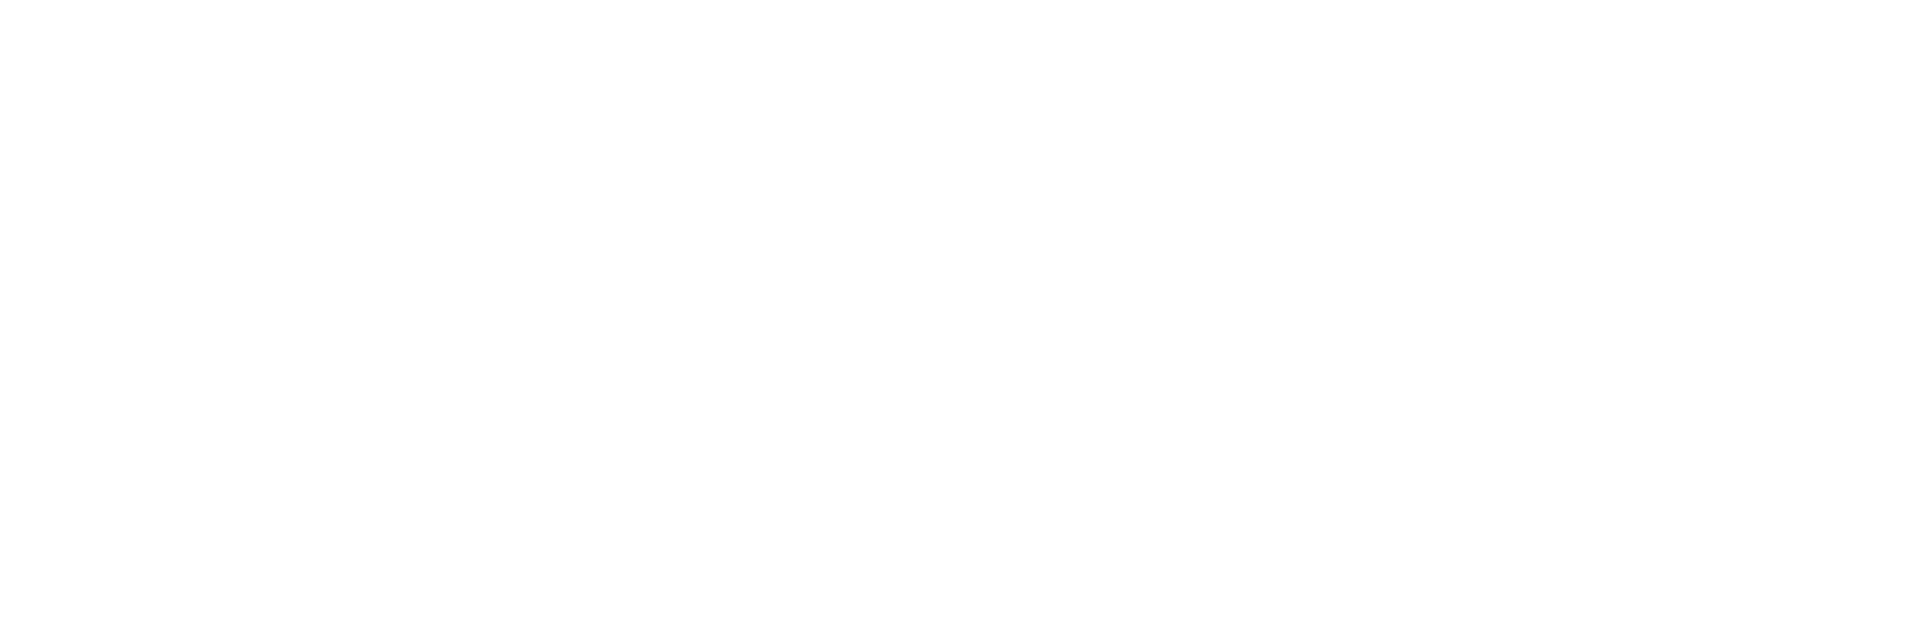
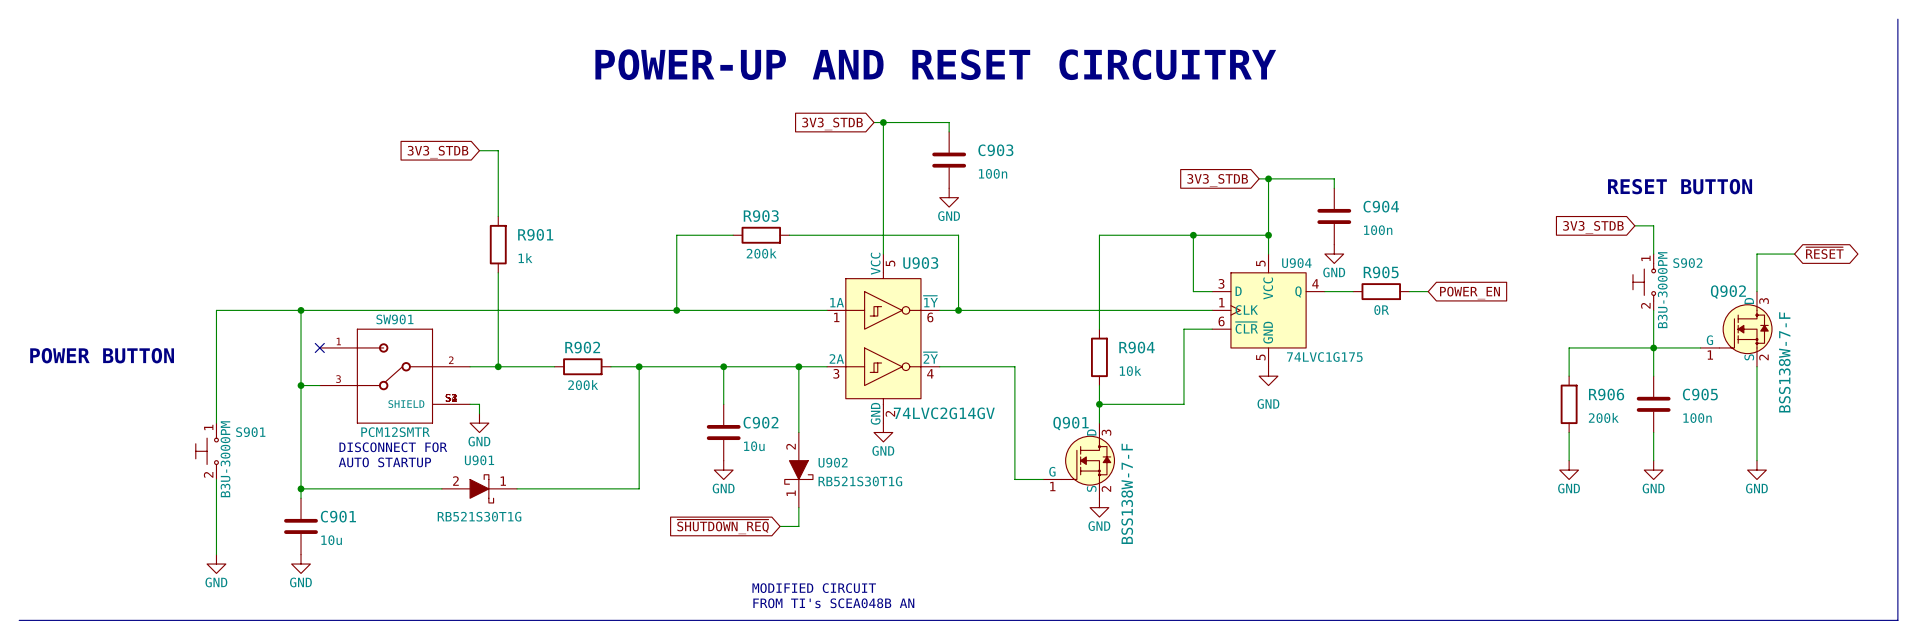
line: none -> (1897, 19) (1897, 620) (19, 620)
text: none -> POWER-UP AND RESET CIRCUITRY (935, 64)
wire: none -> (874, 122) (949, 122) (949, 131)
wire: none -> (883, 122) (883, 254)
junction: none -> (883, 122)
global label: none -> 3V3_STDB (832, 123)
wire: none -> (479, 150) (498, 150) (498, 216)
global label: none -> 3V3_STDB (438, 152)
C903: none -> (949, 160)
wire: none -> (1259, 178) (1334, 178) (1334, 188)
wire: none -> (1268, 178) (1268, 254)
junction: none -> (1268, 178)
global label: none -> 3V3_STDB (1217, 180)
text: none -> RESET BUTTON (1680, 186)
power symbol: none -> GND (949, 197)
C904: none -> (1334, 216)
wire: none -> (1634, 225) (1653, 225) (1653, 254)
global label: none -> 3V3_STDB (1593, 227)
wire: none -> (733, 235) (676, 235) (676, 310)
R903: none -> (761, 235)
wire: none -> (789, 235) (958, 235) (958, 310)
wire: none -> (1193, 235) (1193, 291) (1212, 291)
junction: none -> (1193, 235)
wire: none -> (1268, 235) (1099, 235) (1099, 329)
junction: none -> (1268, 235)
R901: none -> (498, 244)
global label: none -> ~{RESET} (1824, 253)
power symbol: none -> GND (1334, 254)
wire: none -> (1794, 254) (1756, 254) (1756, 291)
wire: none -> (498, 272) (498, 366)
S902: none -> B3U-3000PM (1644, 282)
wire: none -> (1324, 291) (1353, 291)
R905: none -> (1381, 291)
wire: none -> (1409, 291) (1428, 291)
global label: none -> POWER_EN (1469, 293)
wire: none -> (301, 310) (301, 498)
junction: none -> (301, 310)
junction: none -> (676, 310)
wire: none -> (827, 310) (216, 310) (216, 423)
wire: none -> (939, 310) (1212, 310)
junction: none -> (958, 310)
U904: none -> 74LVC1G175 (1268, 310)
wire: none -> (1653, 310) (1653, 376)
wire: none -> (1212, 329) (1183, 329) (1183, 404) (1099, 404)
Q902: none -> BSS138W-7-F (1736, 329)
U903: none -> 74LVC2G14GV (883, 338)
no-connect mark: none -> (319, 347)
junction: none -> (1653, 347)
wire: none -> (1700, 347) (1569, 347) (1569, 376)
text: none -> POWER BUTTON (102, 355)
R904: none -> (1099, 357)
wire: none -> (470, 366) (554, 366)
junction: none -> (498, 366)
R902: none -> (582, 366)
wire: none -> (610, 366) (827, 366)
wire: none -> (639, 366) (639, 488) (517, 488)
junction: none -> (639, 366)
wire: none -> (723, 366) (723, 404)
junction: none -> (723, 366)
wire: none -> (798, 366) (798, 432)
junction: none -> (798, 366)
wire: none -> (939, 366) (1014, 366) (1014, 479) (1043, 479)
wire: none -> (1756, 366) (1756, 460)
SW901: none -> PCM12SMTR (394, 376)
power symbol: none -> GND (1268, 376)
wire: none -> (301, 385) (319, 385)
junction: none -> (301, 385)
wire: none -> (1099, 385) (1099, 423)
wire: none -> (470, 404) (479, 404) (479, 413)
junction: none -> (1099, 404)
R906: none -> (1569, 404)
C905: none -> (1653, 404)
power symbol: none -> GND (479, 423)
C902: none -> (723, 432)
power symbol: none -> GND (883, 432)
wire: none -> (1569, 432) (1569, 460)
wire: none -> (1653, 432) (1653, 460)
text: none -> DISCONNECT FOR (393, 447)
S901: none -> B3U-3000PM (207, 451)
Q901: none -> BSS138W-7-F (1078, 460)
text: none -> AUTO STARTUP (384, 462)
power symbol: none -> GND (723, 470)
U902: none -> RB521S30T1G (798, 470)
power symbol: none -> GND (1569, 470)
power symbol: none -> GND (1653, 470)
power symbol: none -> GND (1756, 470)
wire: none -> (216, 479) (216, 554)
wire: none -> (301, 488) (441, 488)
junction: none -> (301, 488)
U901: none -> RB521S30T1G (479, 488)
wire: none -> (798, 507) (798, 526) (780, 526)
power symbol: none -> GND (1099, 507)
C901: none -> (301, 526)
global label: none -> ~{SHUTDOWN_REQ} (723, 526)
power symbol: none -> GND (216, 564)
power symbol: none -> GND (301, 564)
text: none -> MODIFIED CIRCUIT (814, 588)
text: none -> FROM TI's SCEA048B AN (833, 603)

